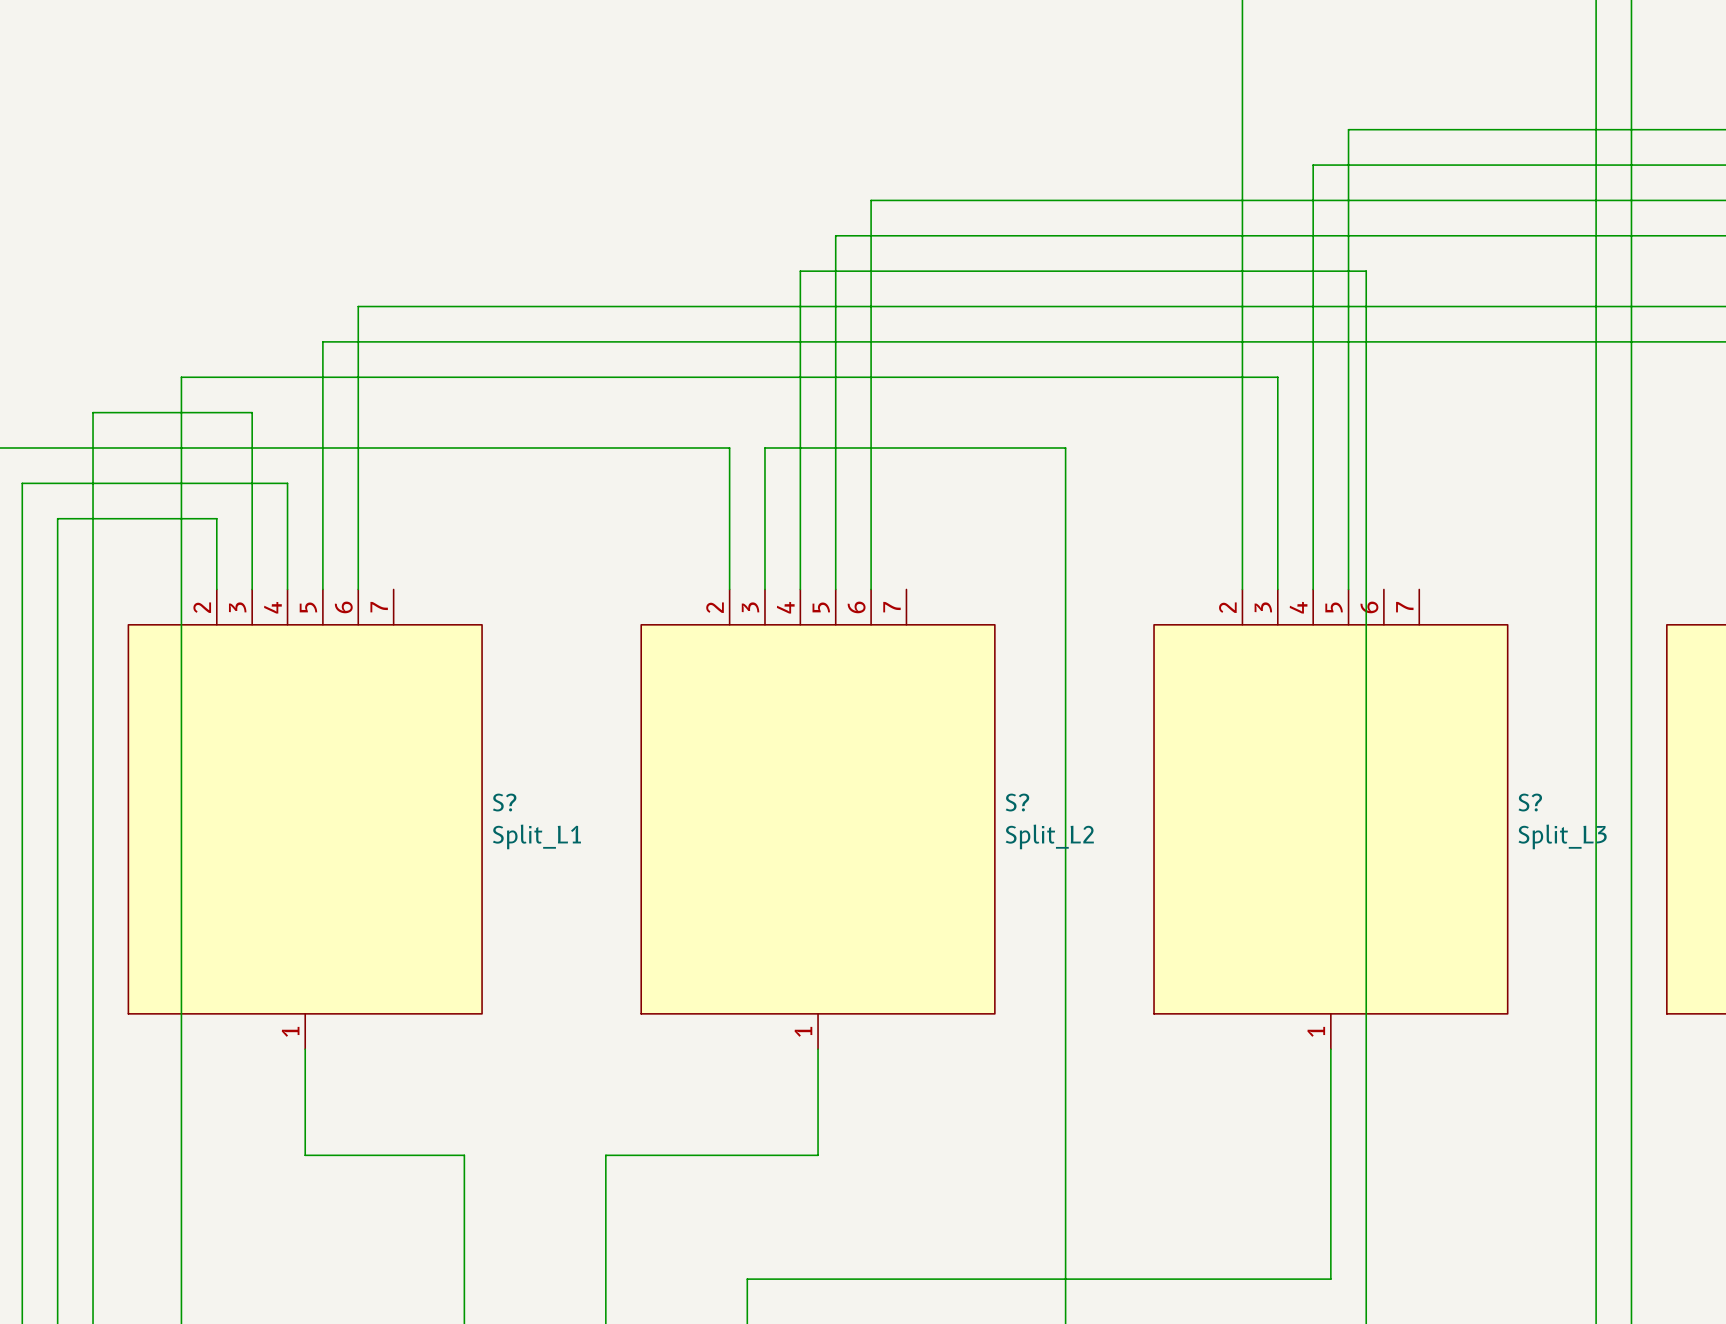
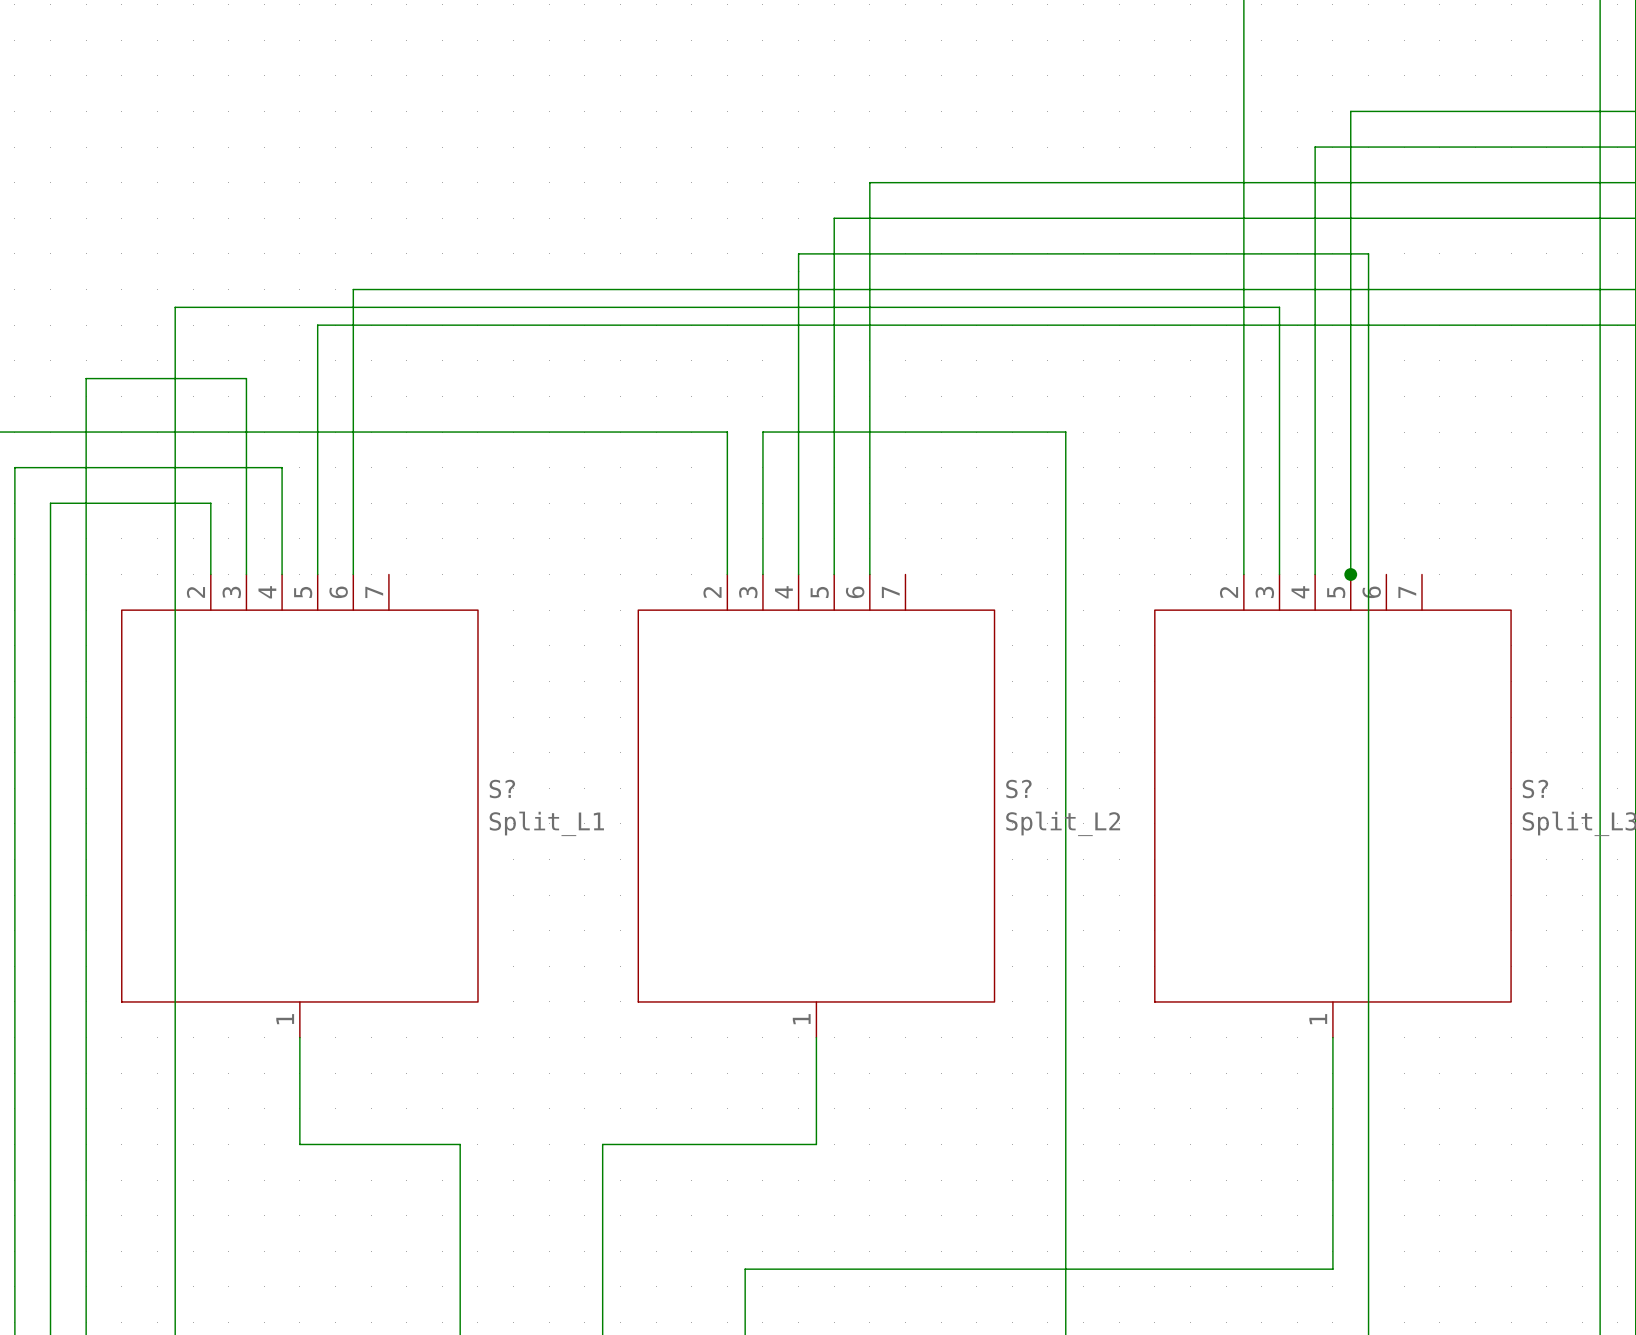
wire: (181, 377) (1277, 377) -> (175, 360) (175, 307) (1279, 307) (1279, 360)
wire: (93, 412) (252, 412) -> (86, 396) (86, 378) (246, 378) (246, 396)
junction: none -> (1350, 574)

